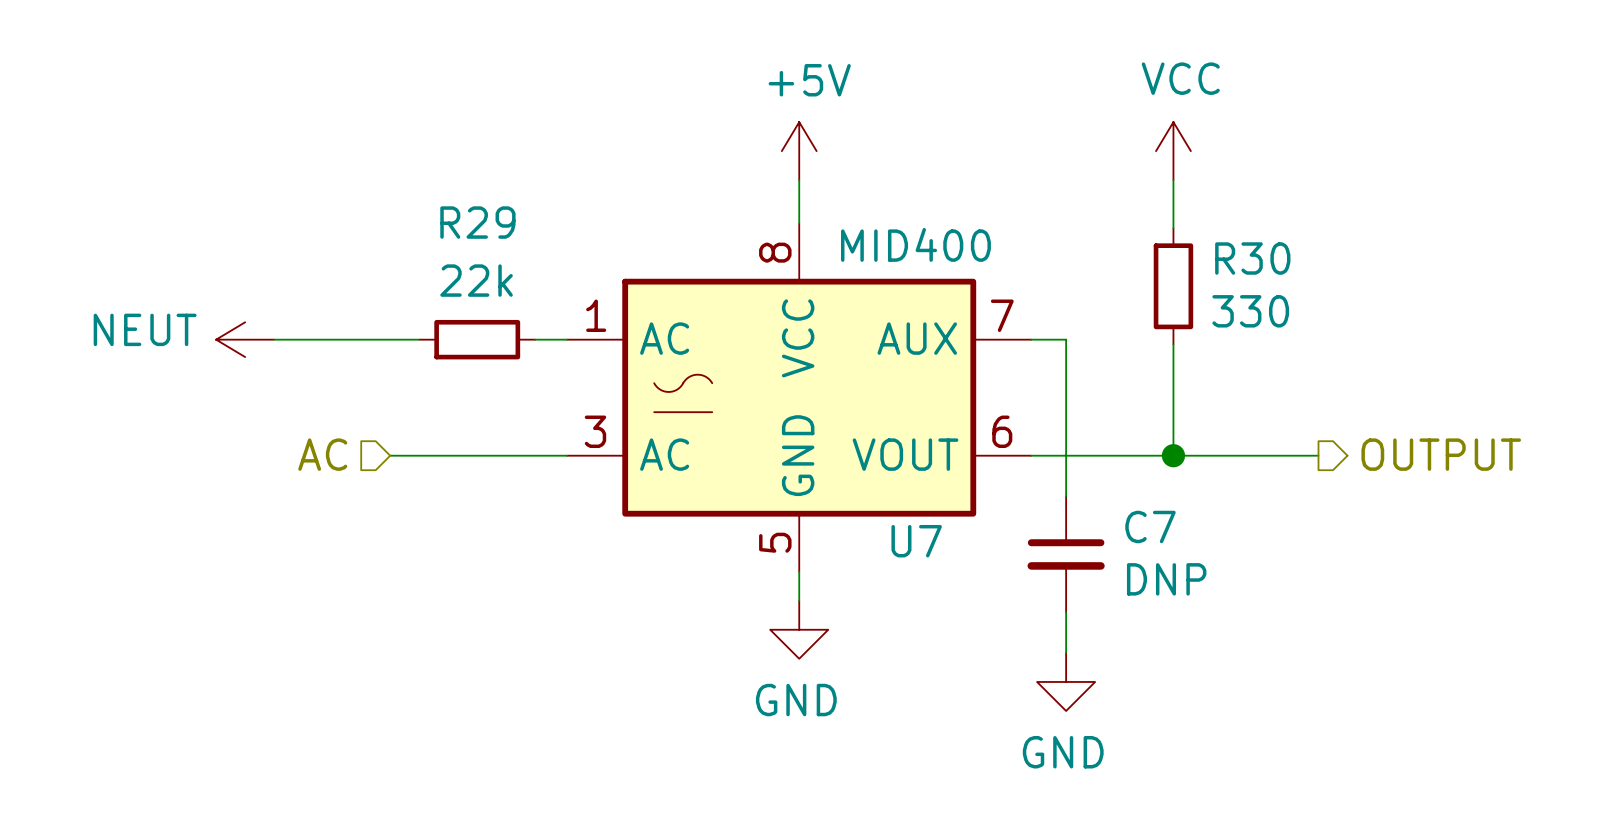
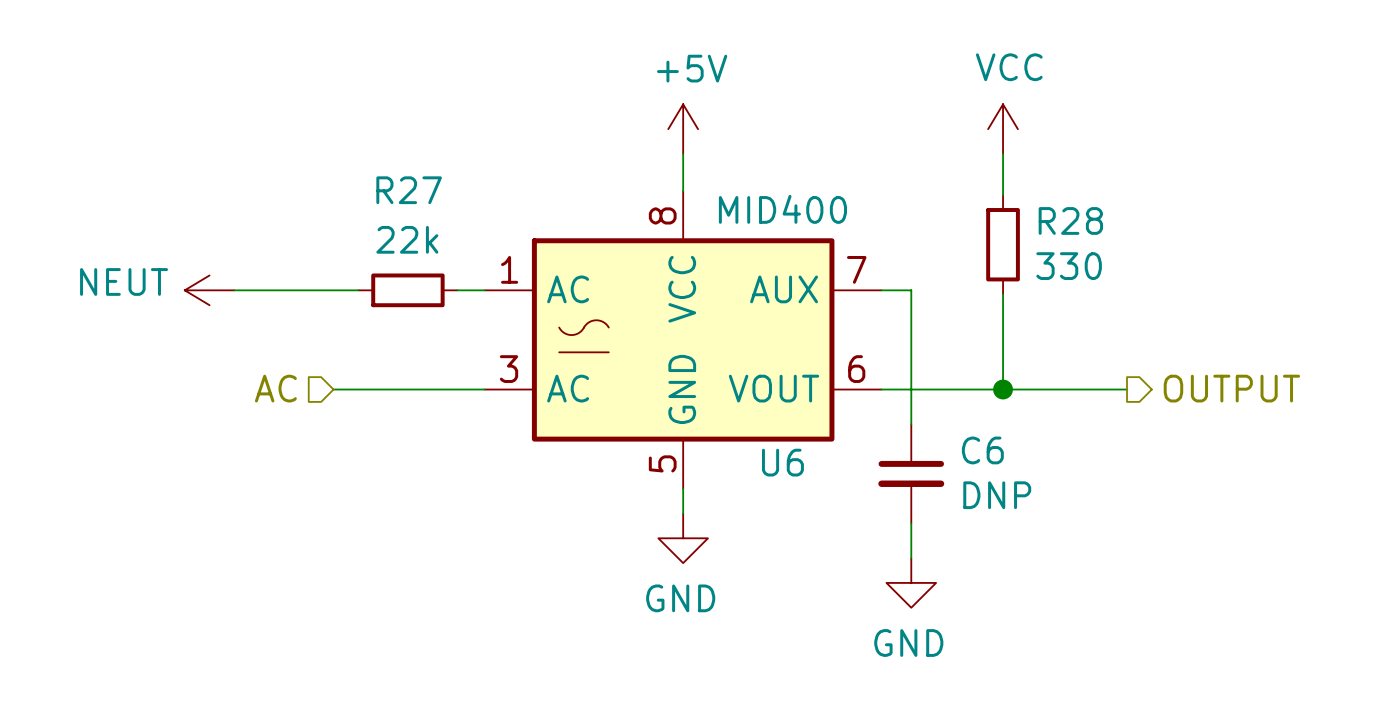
R29 name: R29 (477, 222) -> R27 (409, 190)
R30 name: R30 (1252, 258) -> R28 (1070, 220)
C7 name: C7 (1150, 526) -> C6 (982, 450)
U7 name: U7 (916, 541) -> U6 (782, 462)

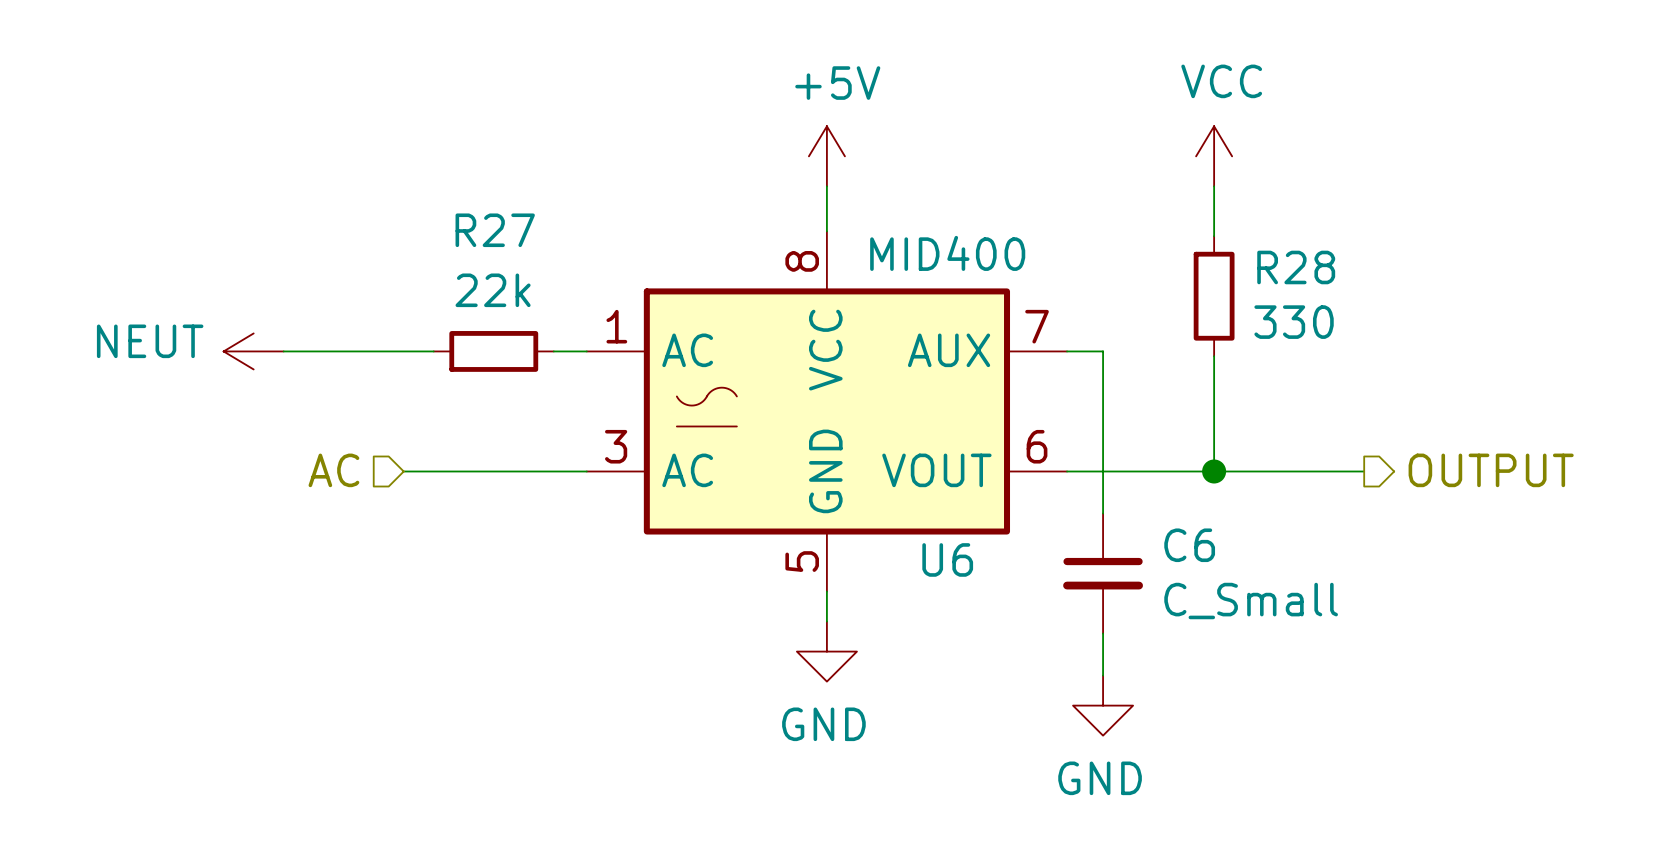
C6 value: DNP (997, 495) -> C_Small (1251, 601)

